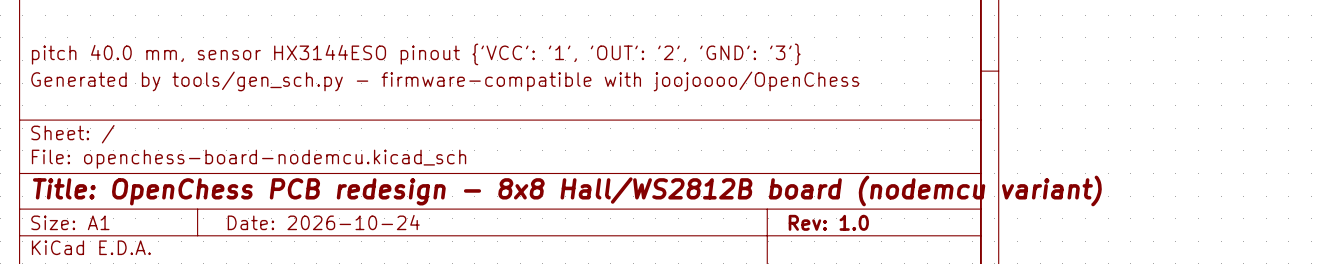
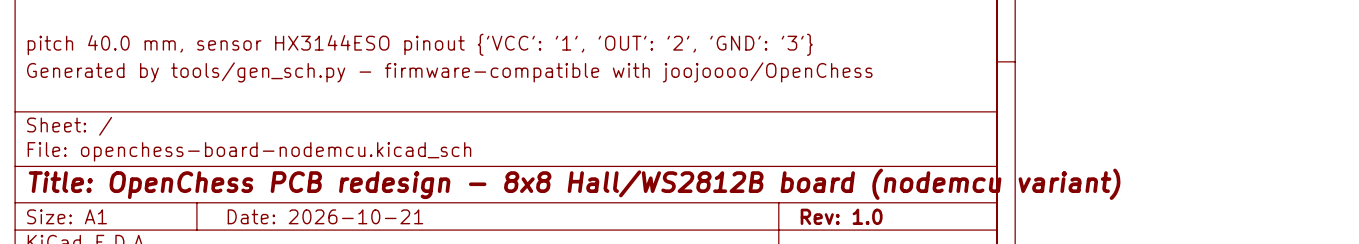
title block: Date: 2026-10-24 (323, 222) -> Date: 2026-10-21 (325, 216)

